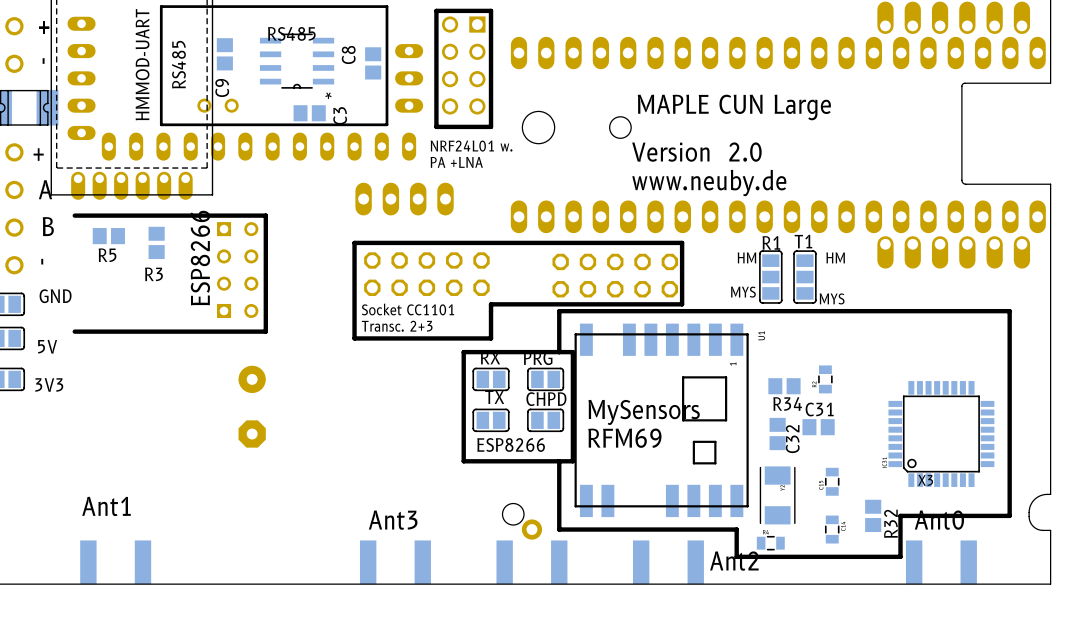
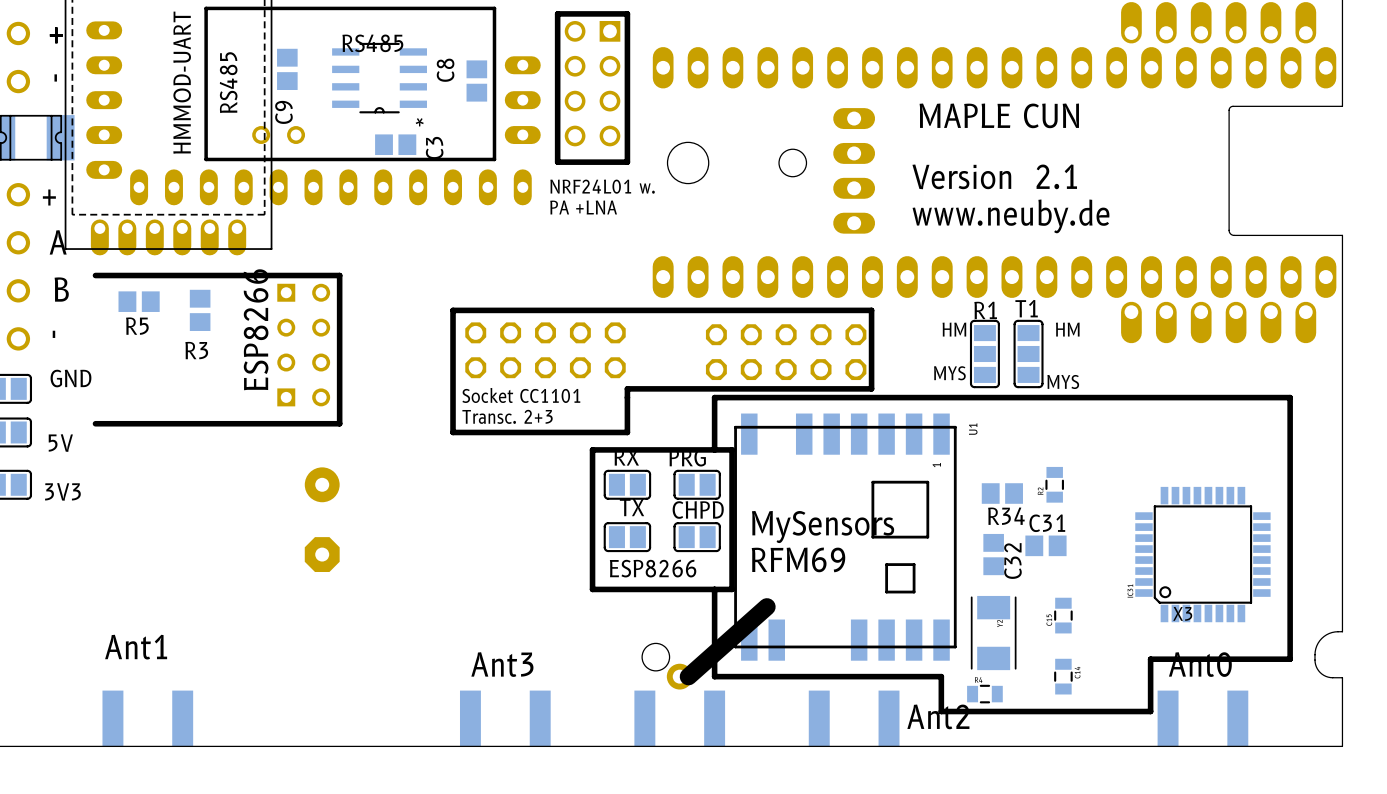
text: MAPLE CUN Large (734, 107) -> MAPLE CUN (999, 115)
part: none -> (854, 170)
text: Version 2.0 (696, 152) -> Version 2.1 (994, 176)
text position: www.neuby.de (709, 183) -> www.neuby.de (1010, 216)
part: (404, 199) -> none
line: none -> (766, 606) (688, 676)
R32: (873, 515) -> none

